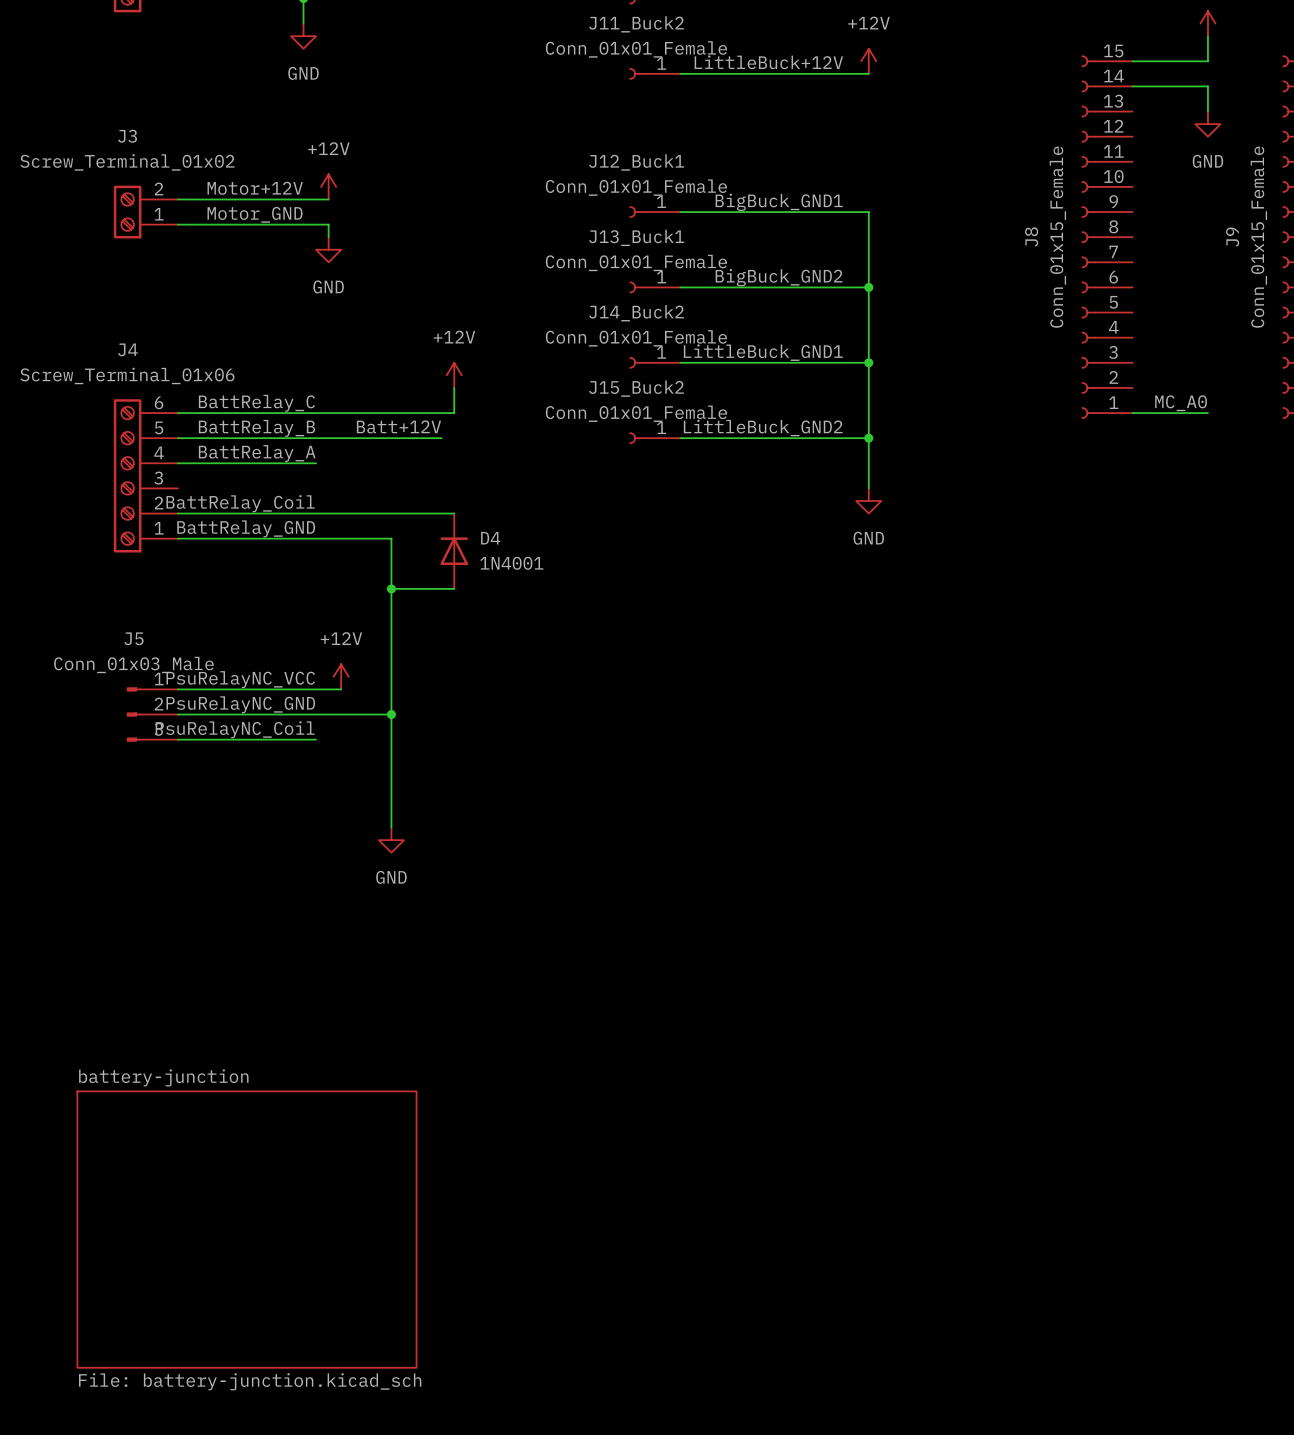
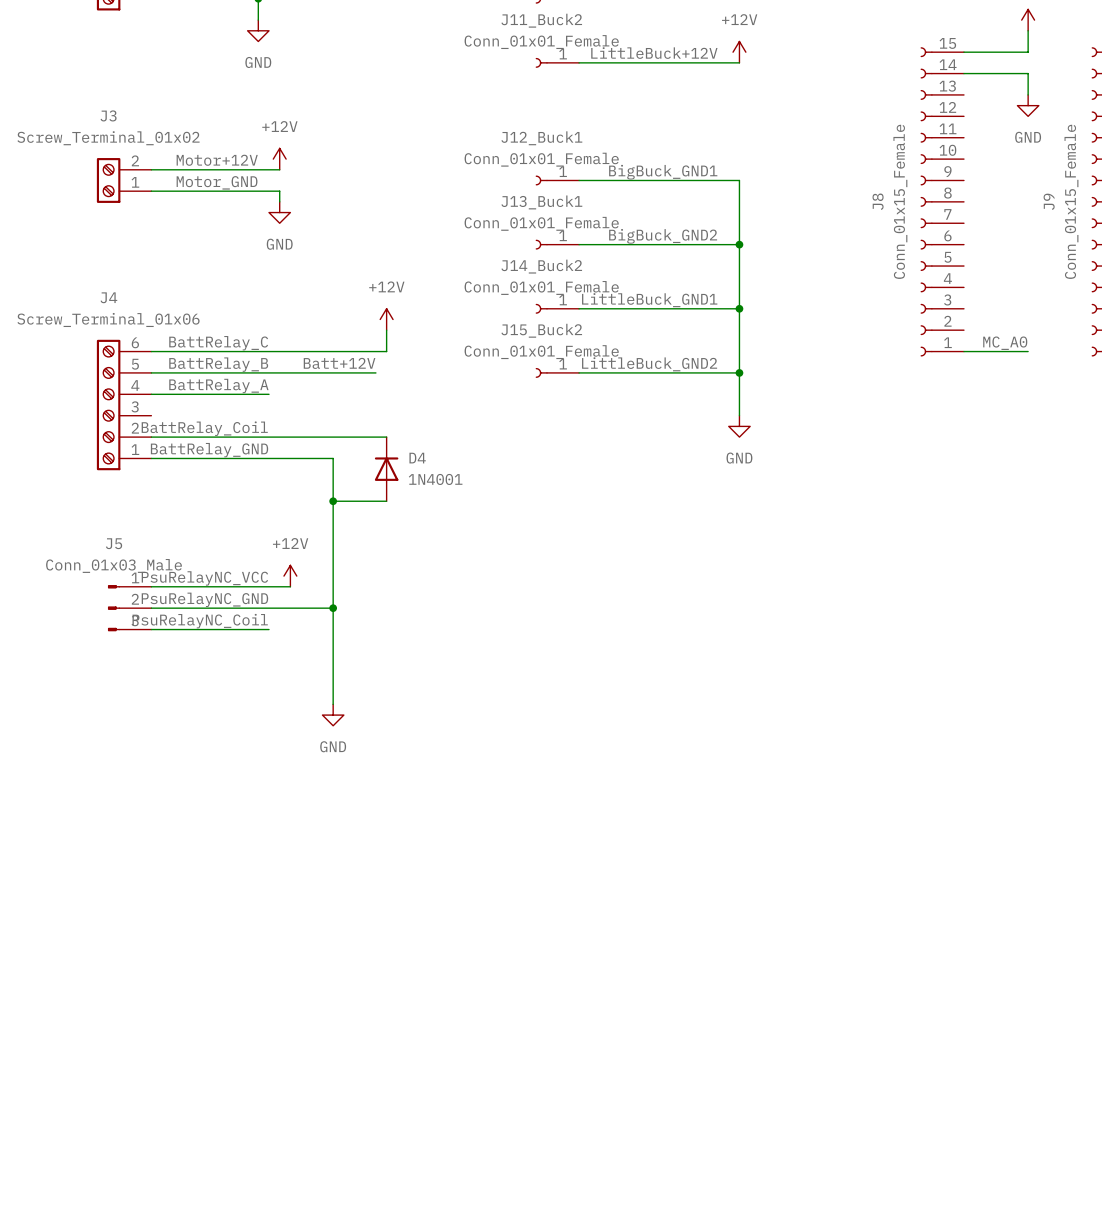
sheet battery-junction: File: battery-junction.kicad_sch (246, 1229) -> none

